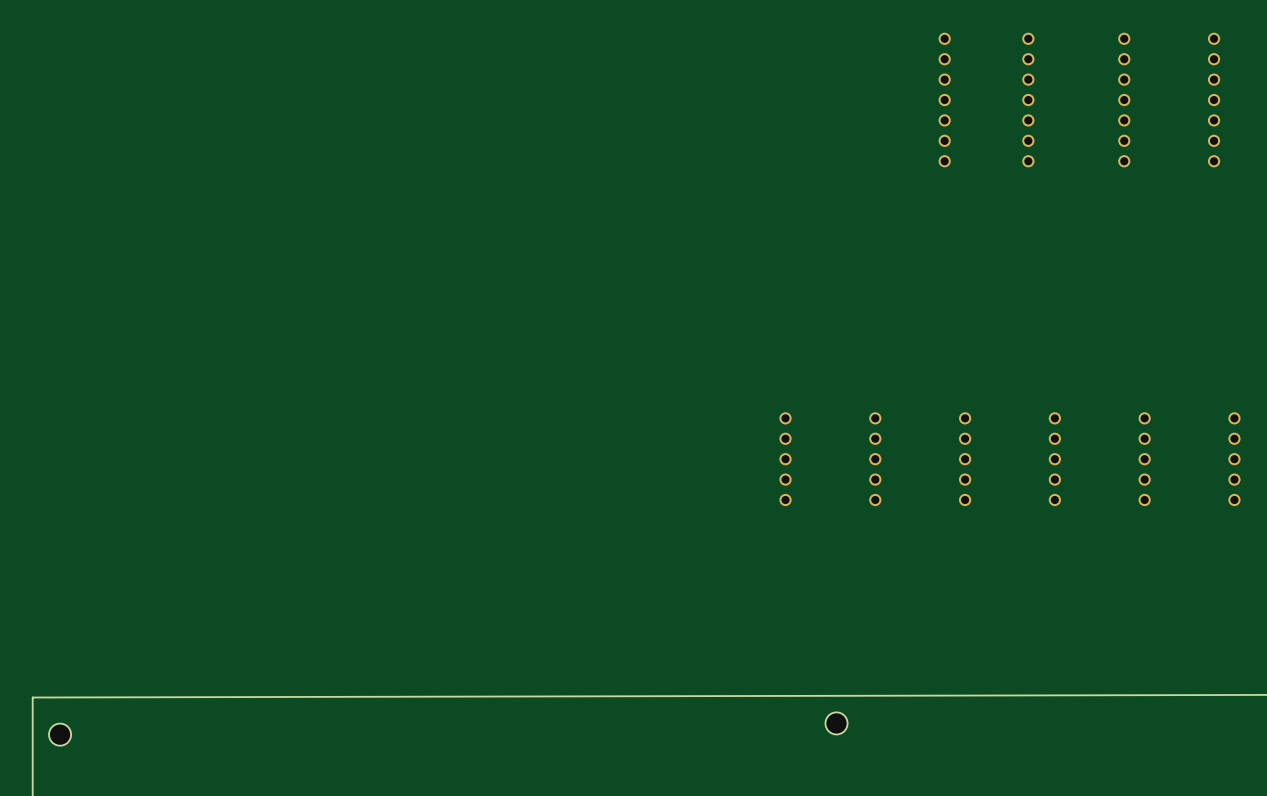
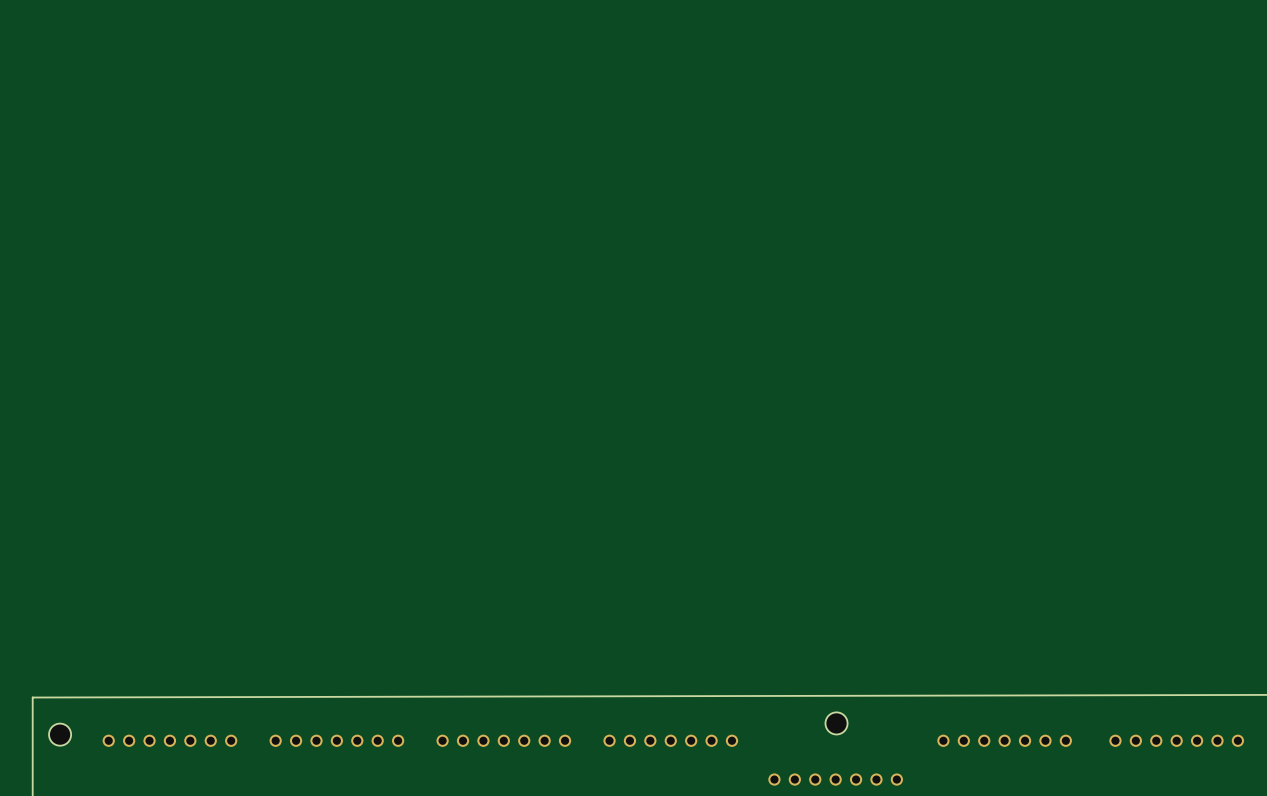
part: (944, 100) -> none
part: (1028, 100) -> none
part: (1124, 100) -> none
part: (1214, 100) -> none
part: (785, 459) -> none
part: (875, 459) -> none
part: (965, 459) -> none
part: (1054, 459) -> none
part: (1144, 459) -> none
part: (1234, 459) -> none
part: none -> (169, 740)
part: none -> (336, 740)
part: none -> (503, 740)
part: none -> (670, 740)
part: none -> (1004, 740)
part: none -> (1176, 740)
part: none -> (835, 779)

